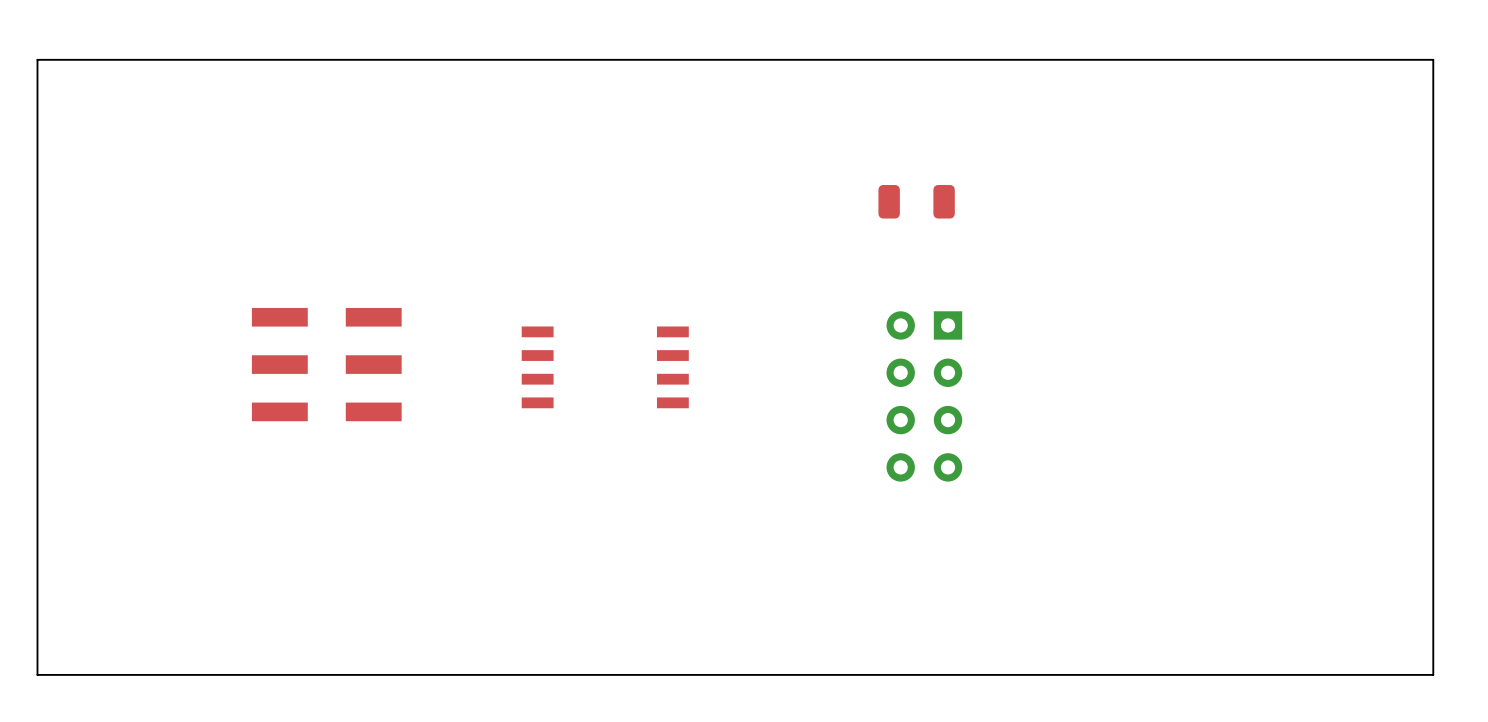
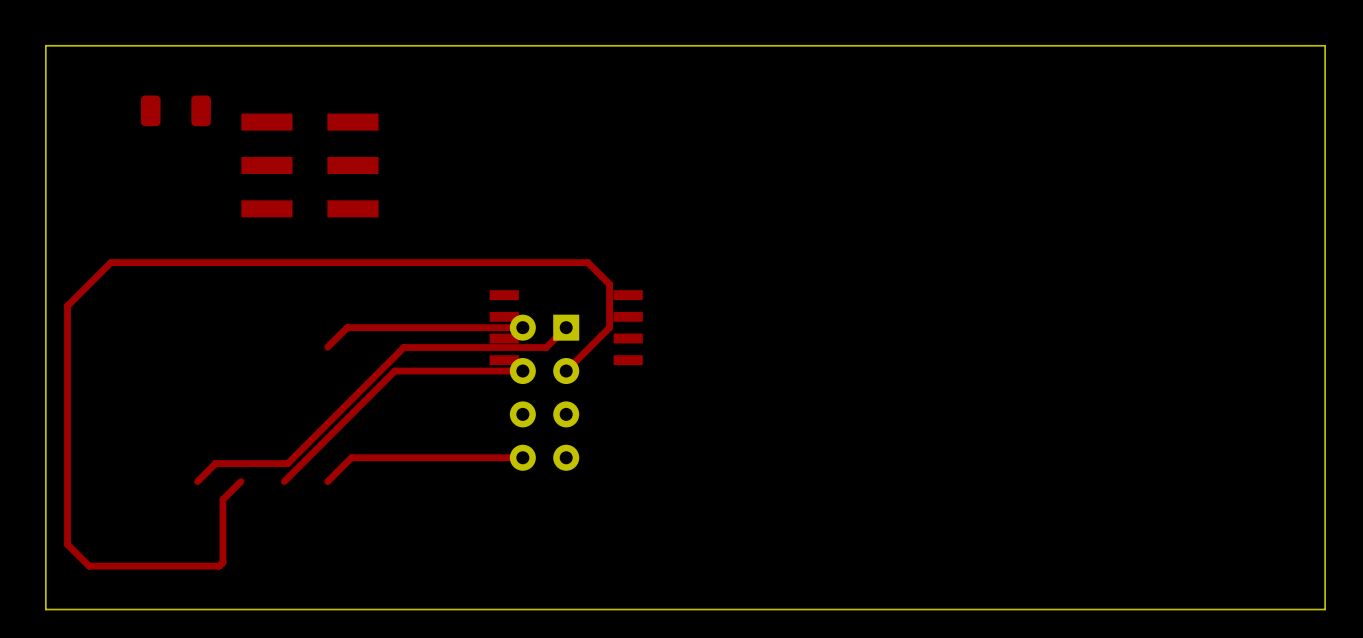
part: none -> (175, 110)
part: (916, 201) -> none
part position: (326, 364) -> (309, 165)
top track: none -> (522, 327) (347, 327) (327, 347)
top track: none -> (566, 327) (546, 347) (403, 347) (287, 463) (215, 463) (197, 481)
part position: (924, 396) -> (544, 392)
top track: none -> (522, 371) (394, 371) (284, 481)
top track: none -> (566, 371) (609, 327) (609, 284) (587, 262) (110, 262) (67, 305) (67, 544) (89, 566) (219, 566) (222, 562) (222, 499) (240, 481)
top track: none -> (522, 457) (351, 457) (327, 481)

